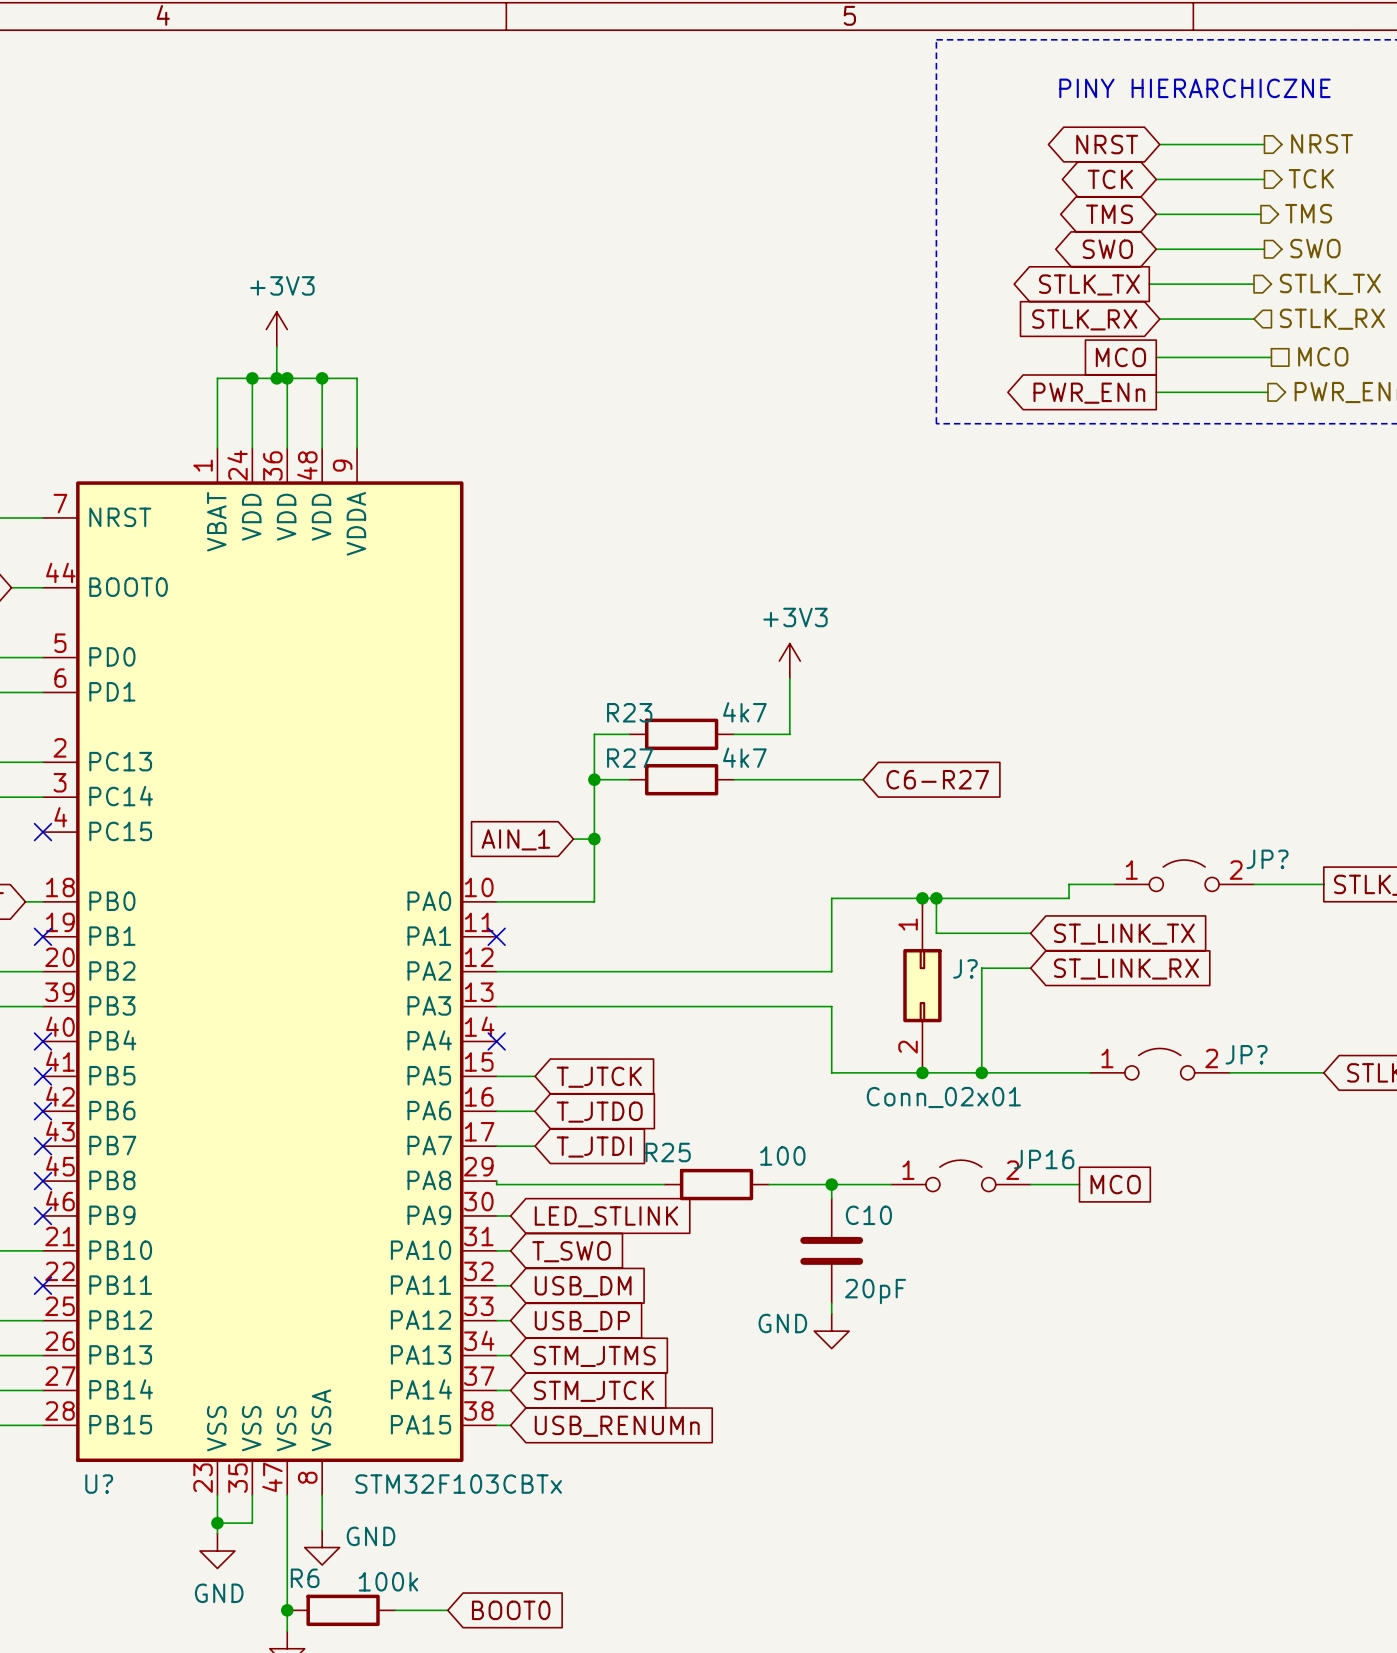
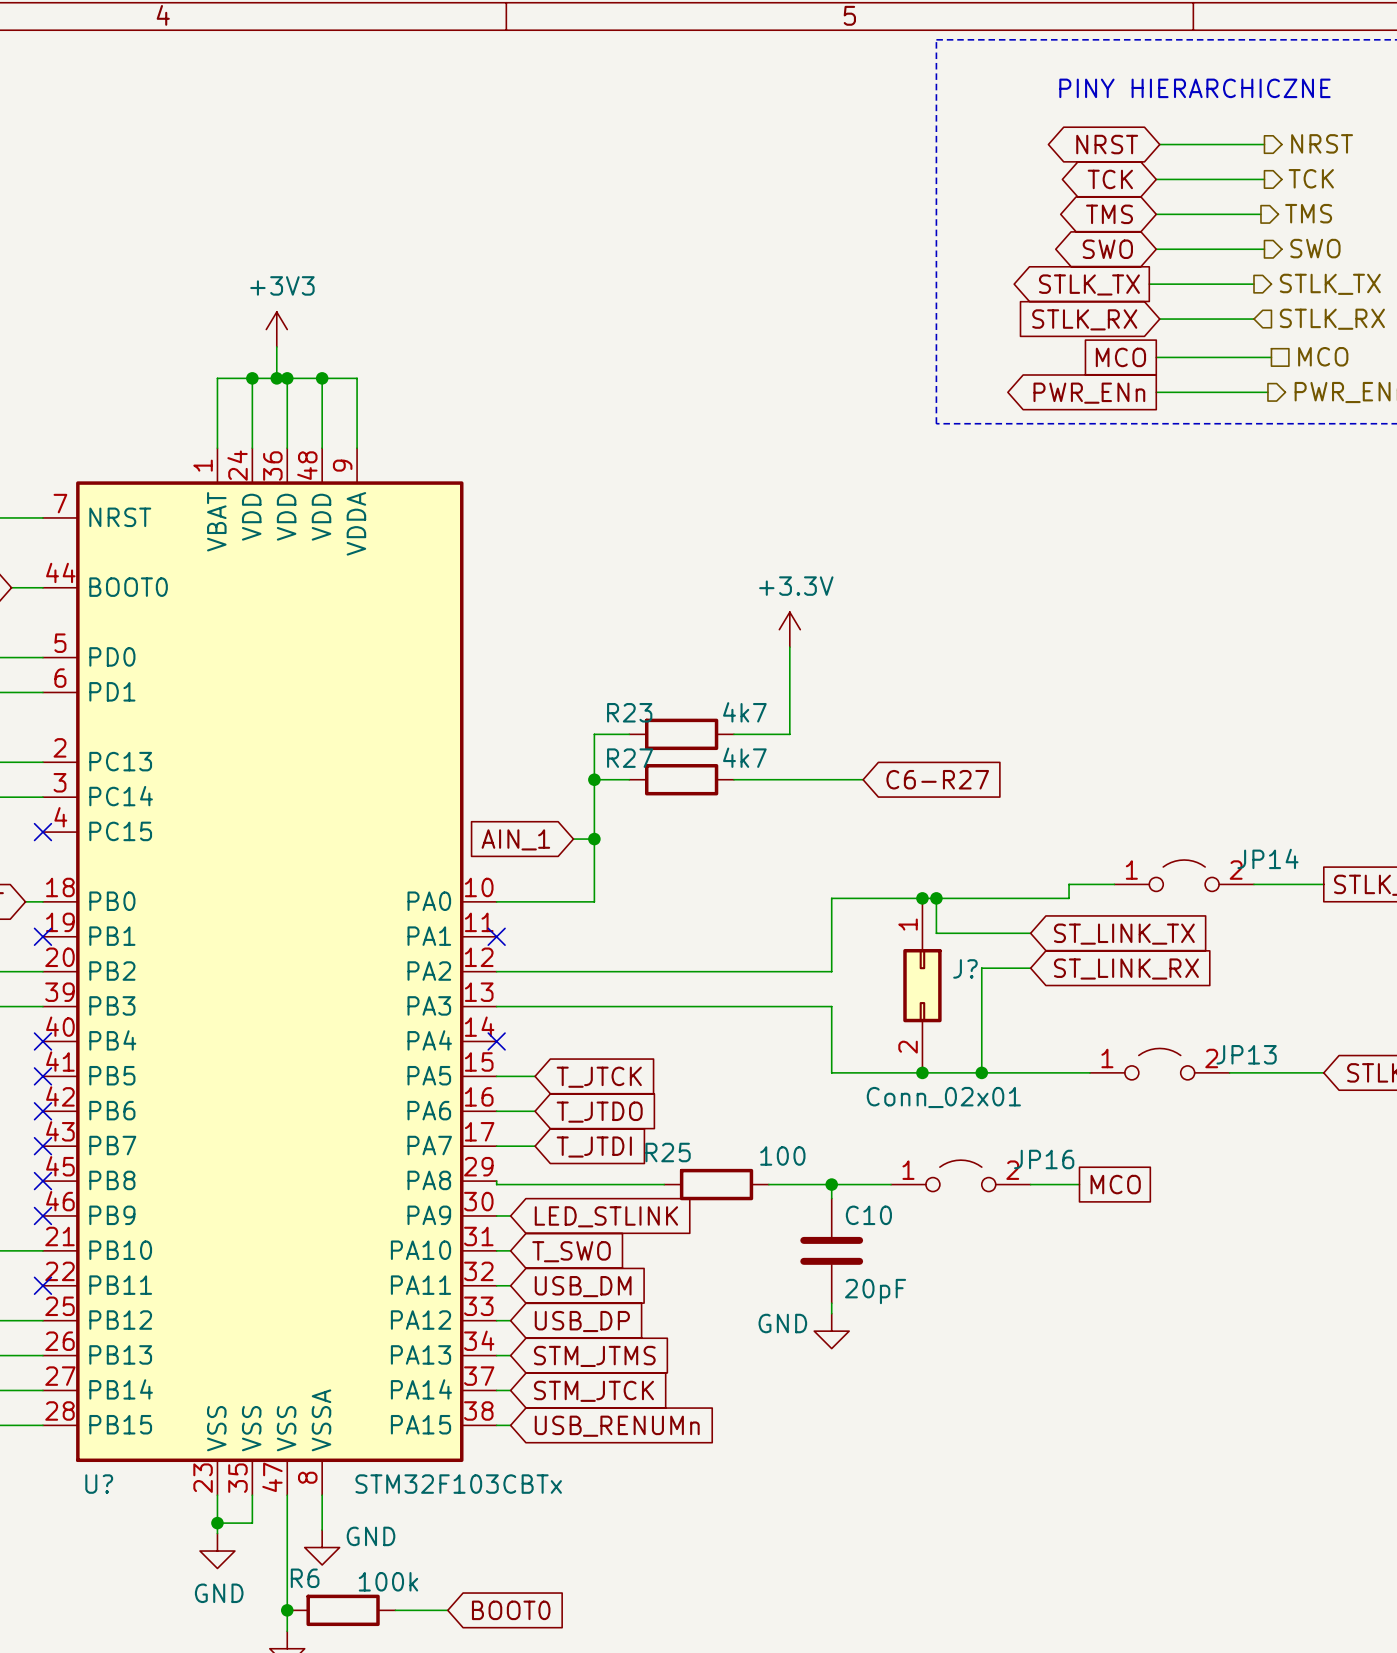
power symbol: none -> +3.3V (789, 629)
power symbol: +3V3 (789, 661) -> none
JP? name: JP? (1267, 859) -> JP14 (1267, 858)
JP? name: JP? (1246, 1054) -> JP13 (1246, 1054)

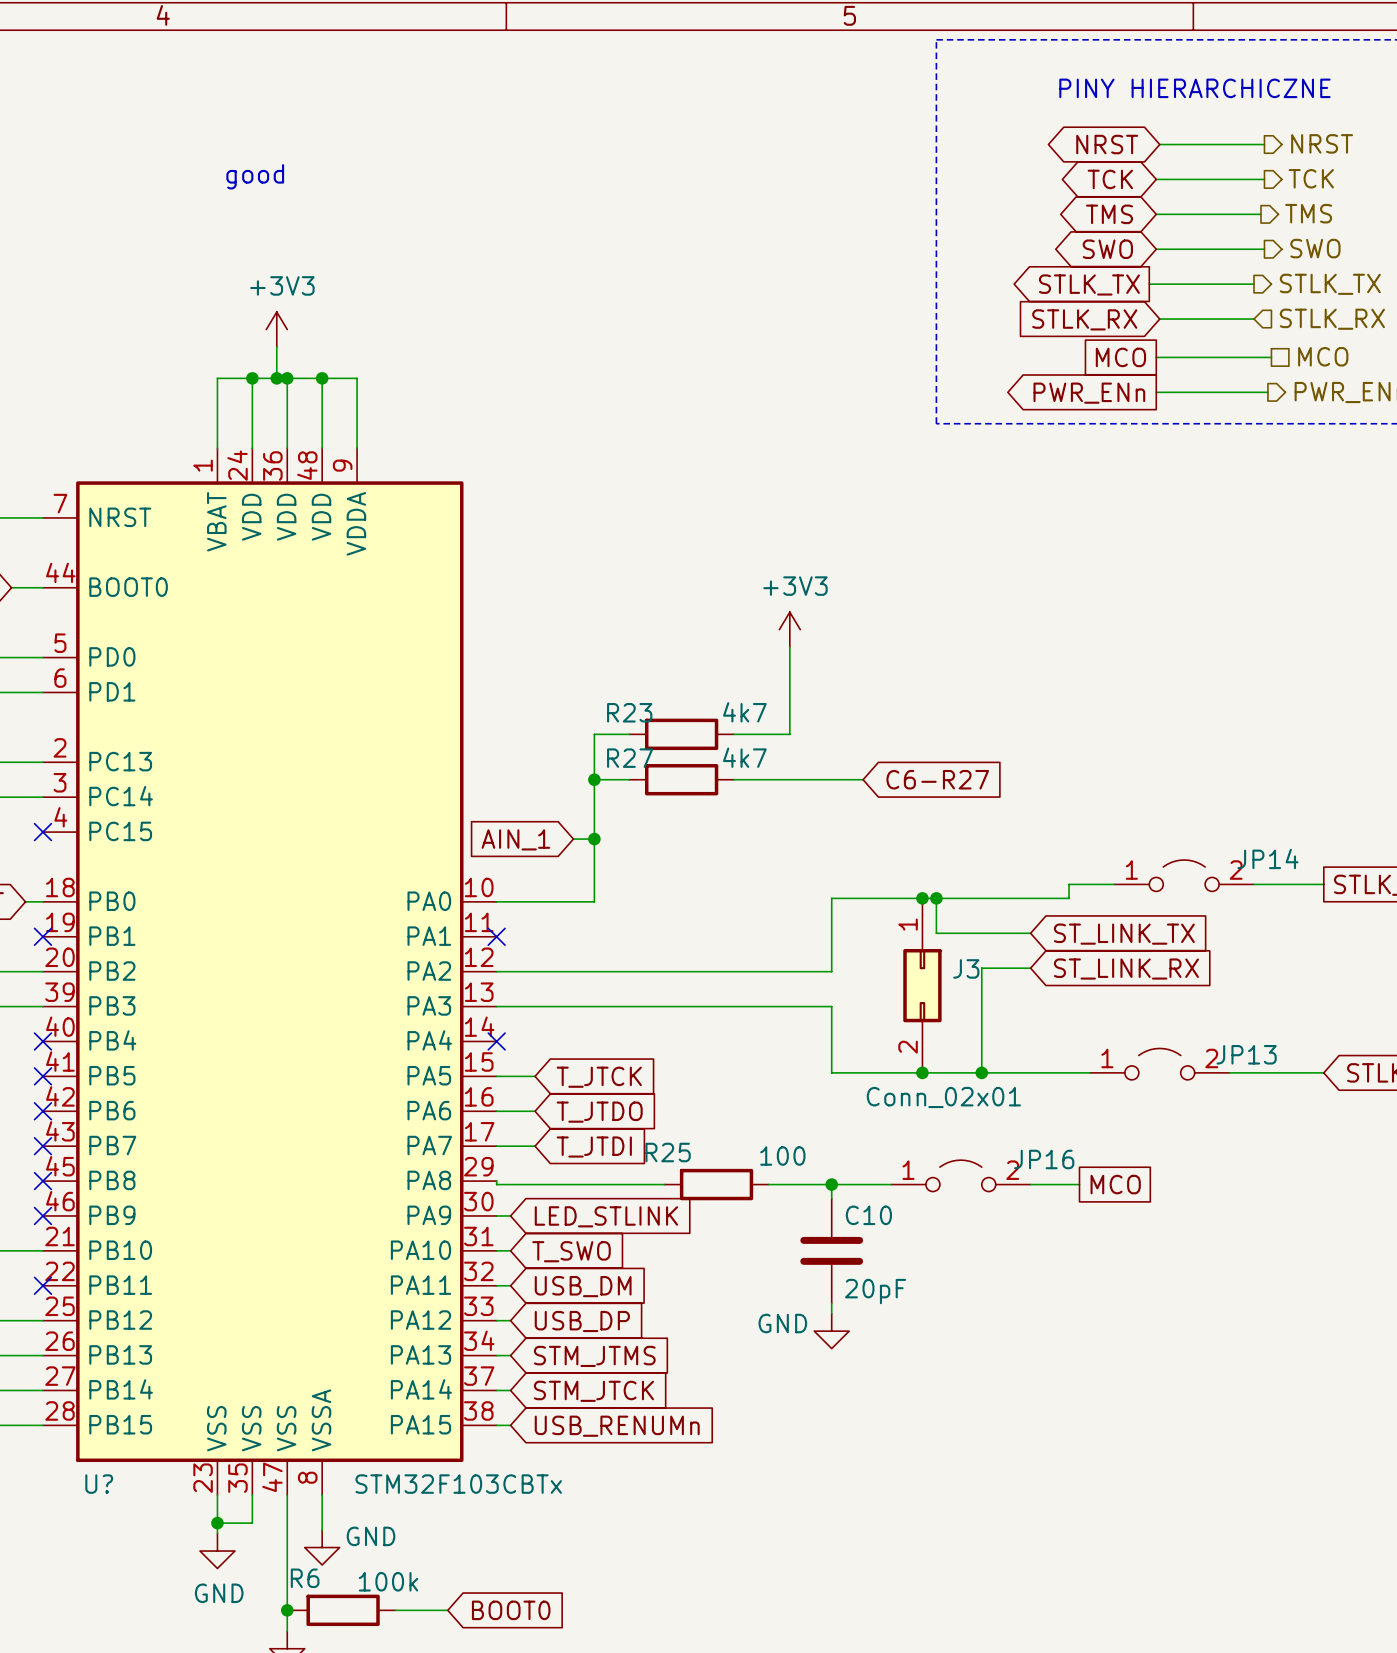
text: none -> good (255, 176)
power symbol: +3.3V (789, 629) -> +3V3 (789, 629)
J? name: J? (965, 968) -> J3 (966, 968)

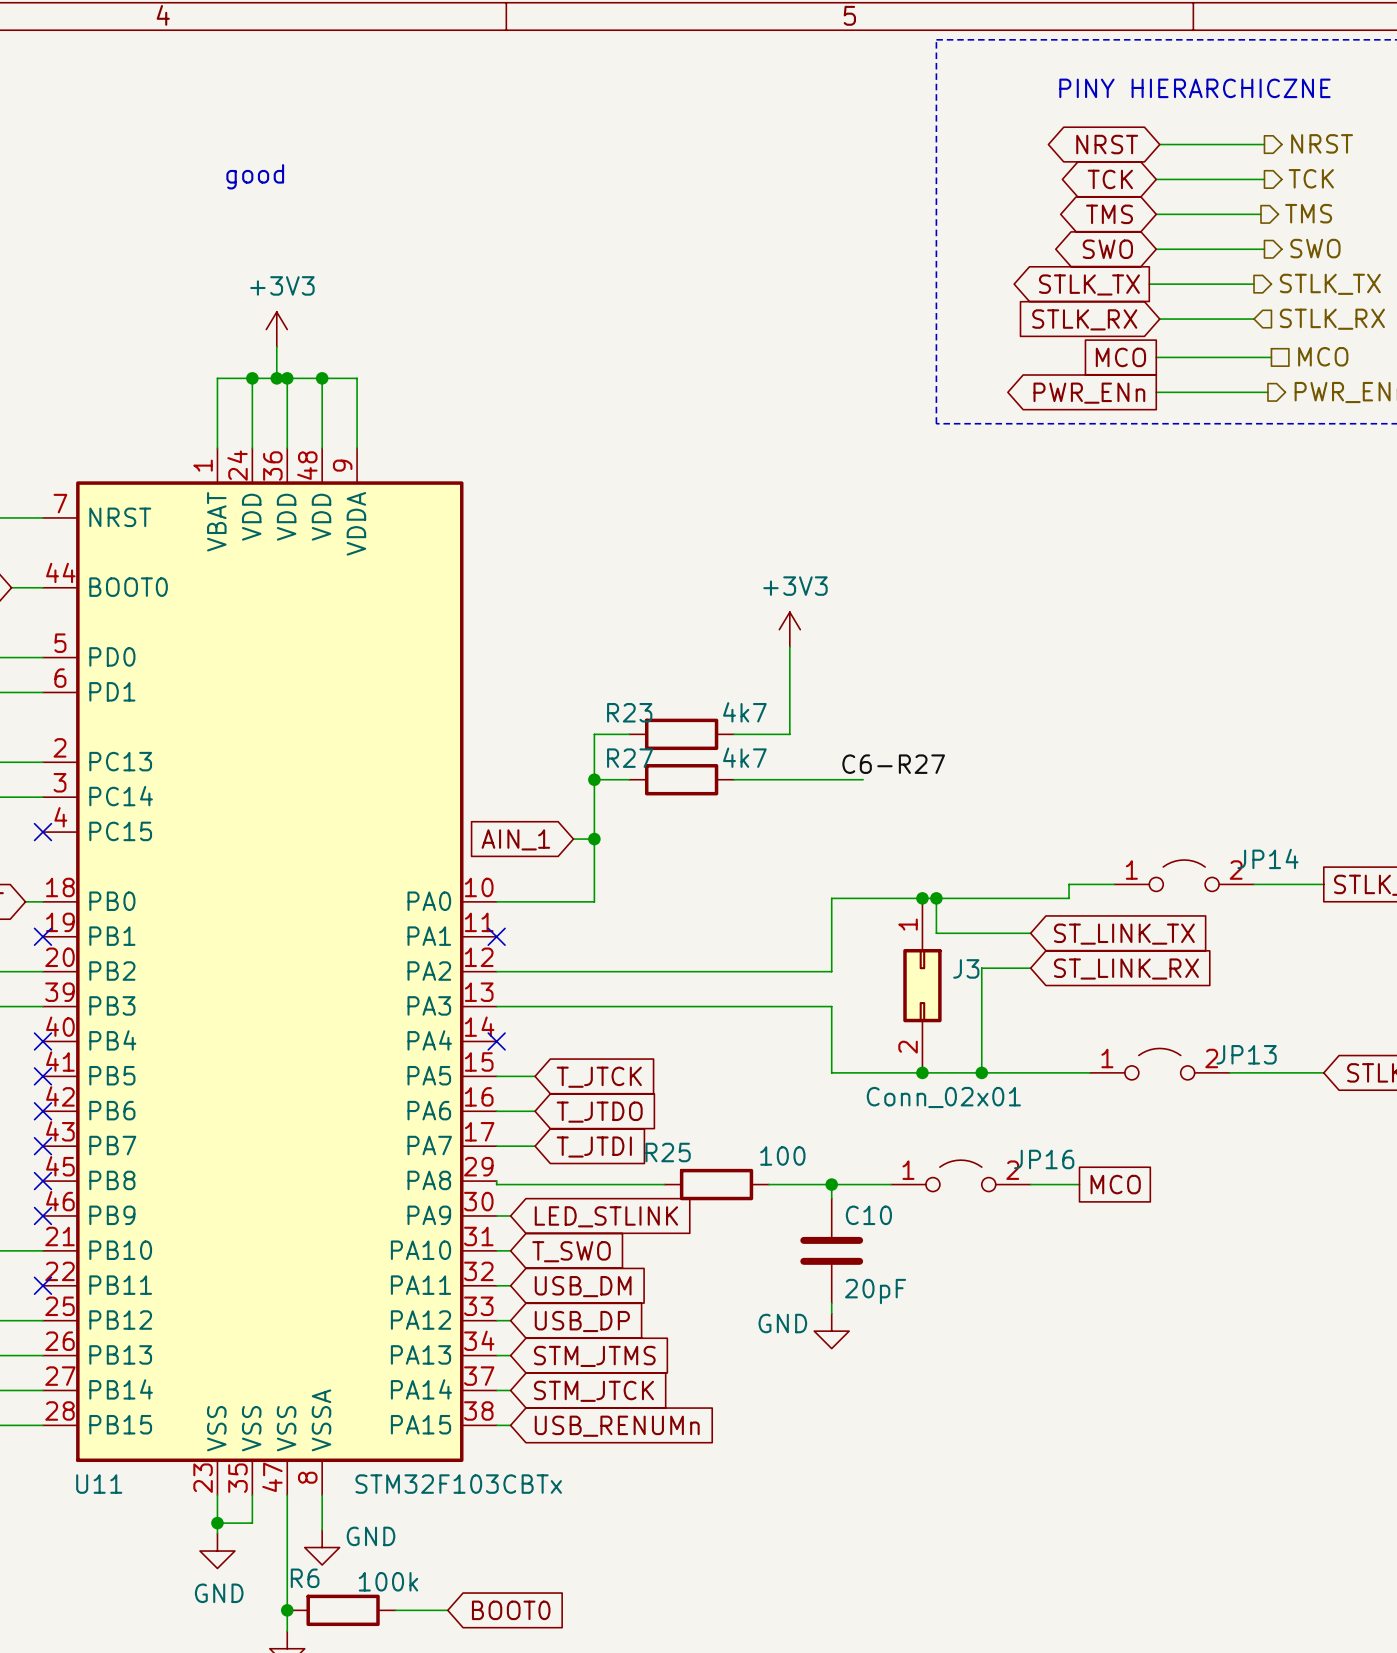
label: none -> C6-R27 (893, 764)
global label: C6-R27 (937, 779) -> none
U? name: U? (99, 1484) -> U11 (99, 1484)

